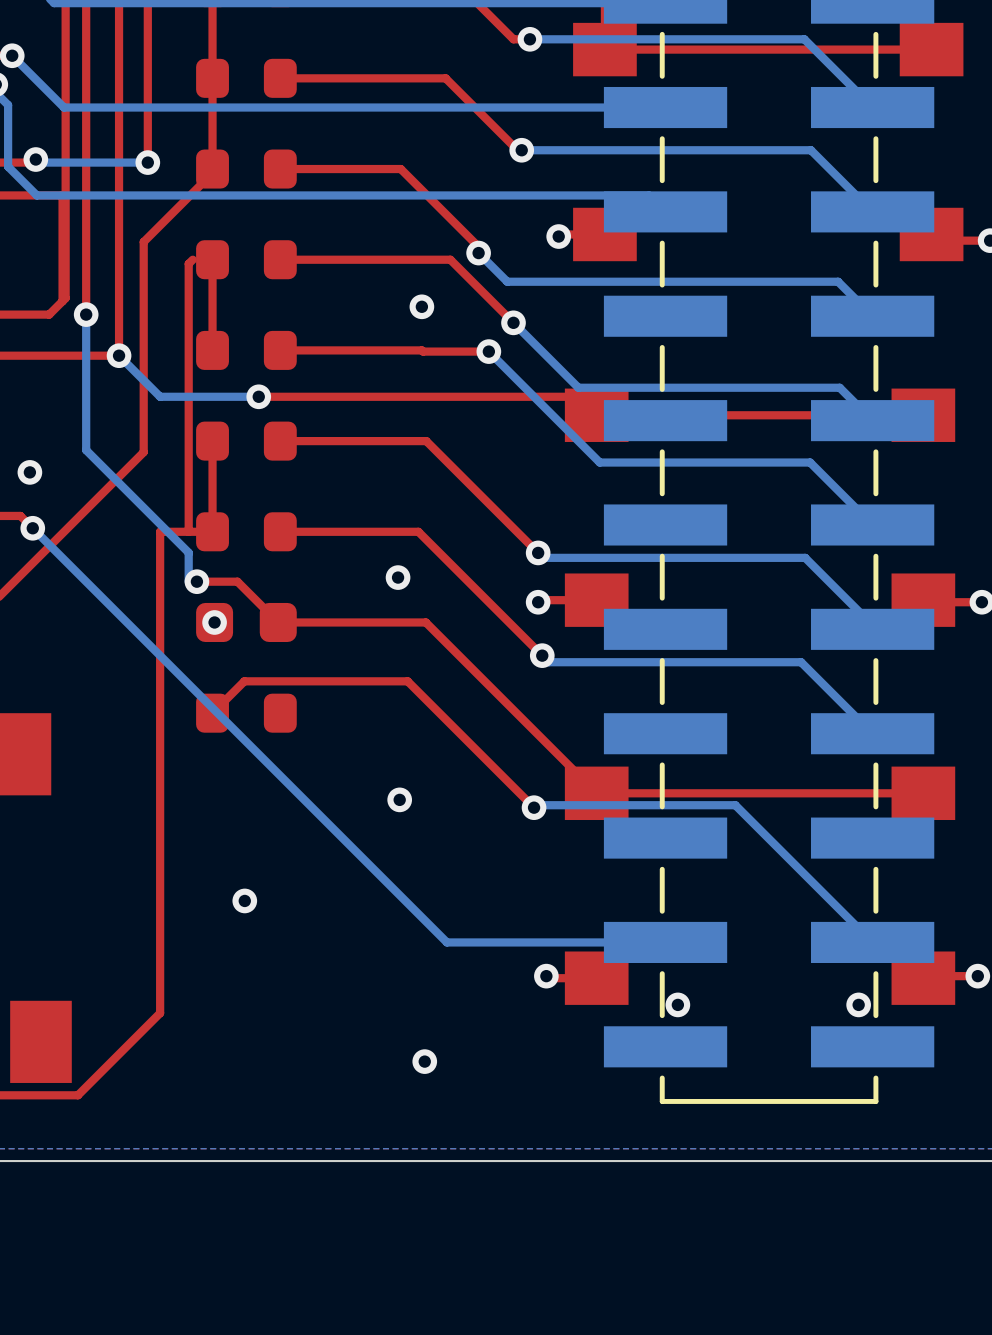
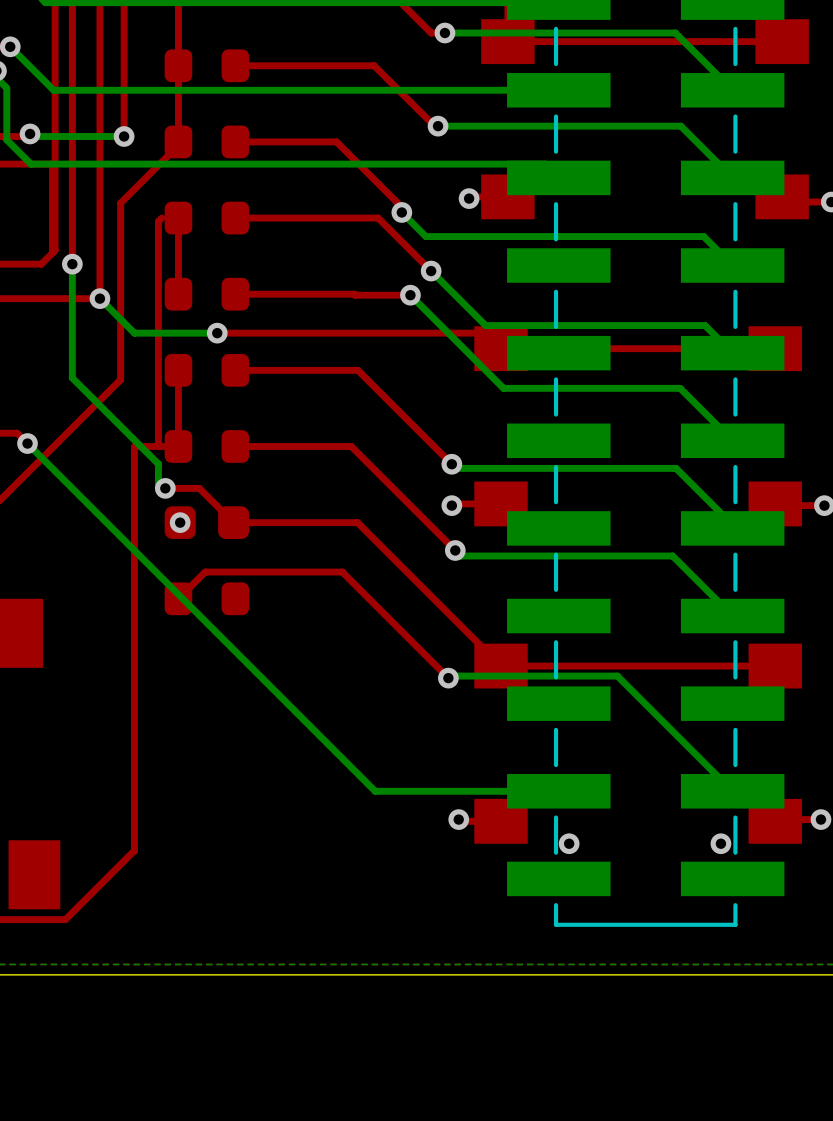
via: (421, 306) -> none
via: (29, 472) -> none
via: (398, 577) -> none
via: (399, 799) -> none
via: (244, 900) -> none
via: (424, 1061) -> none

